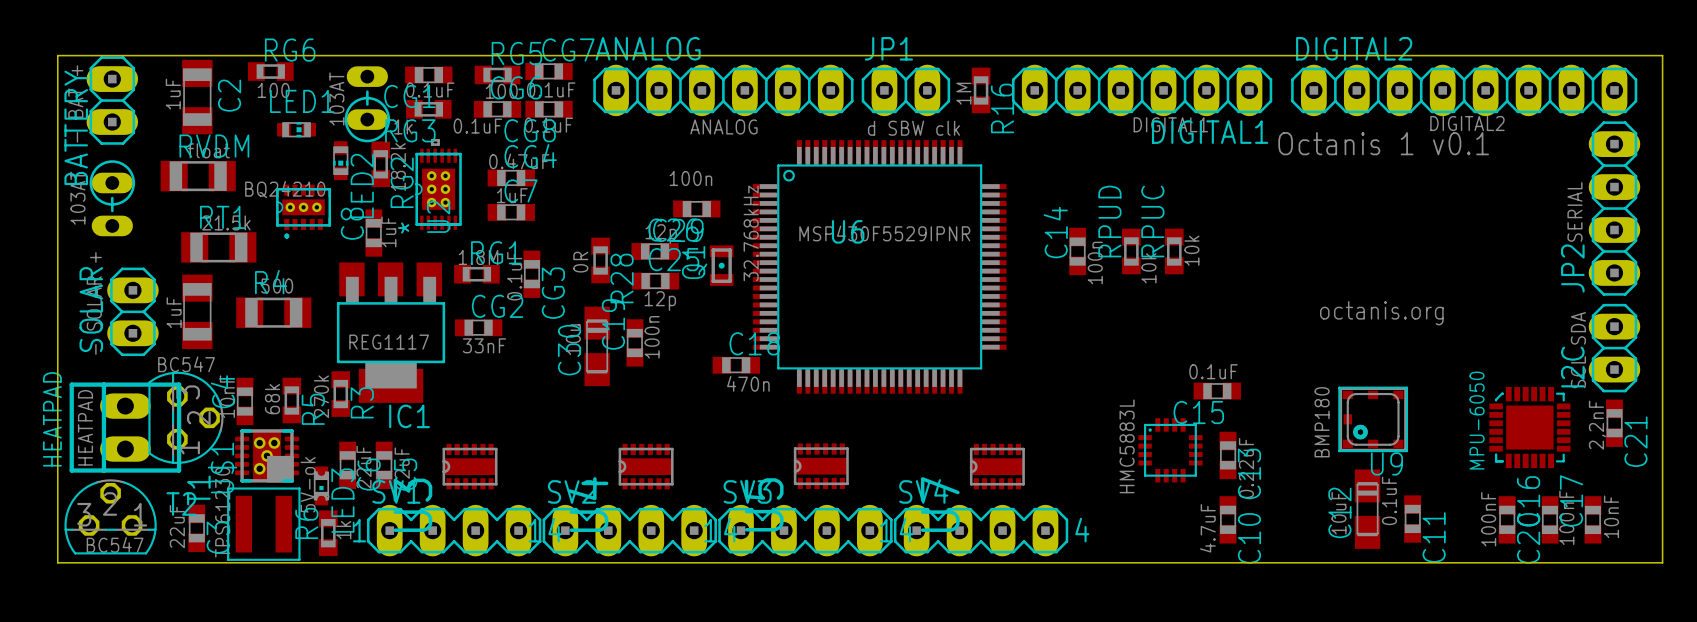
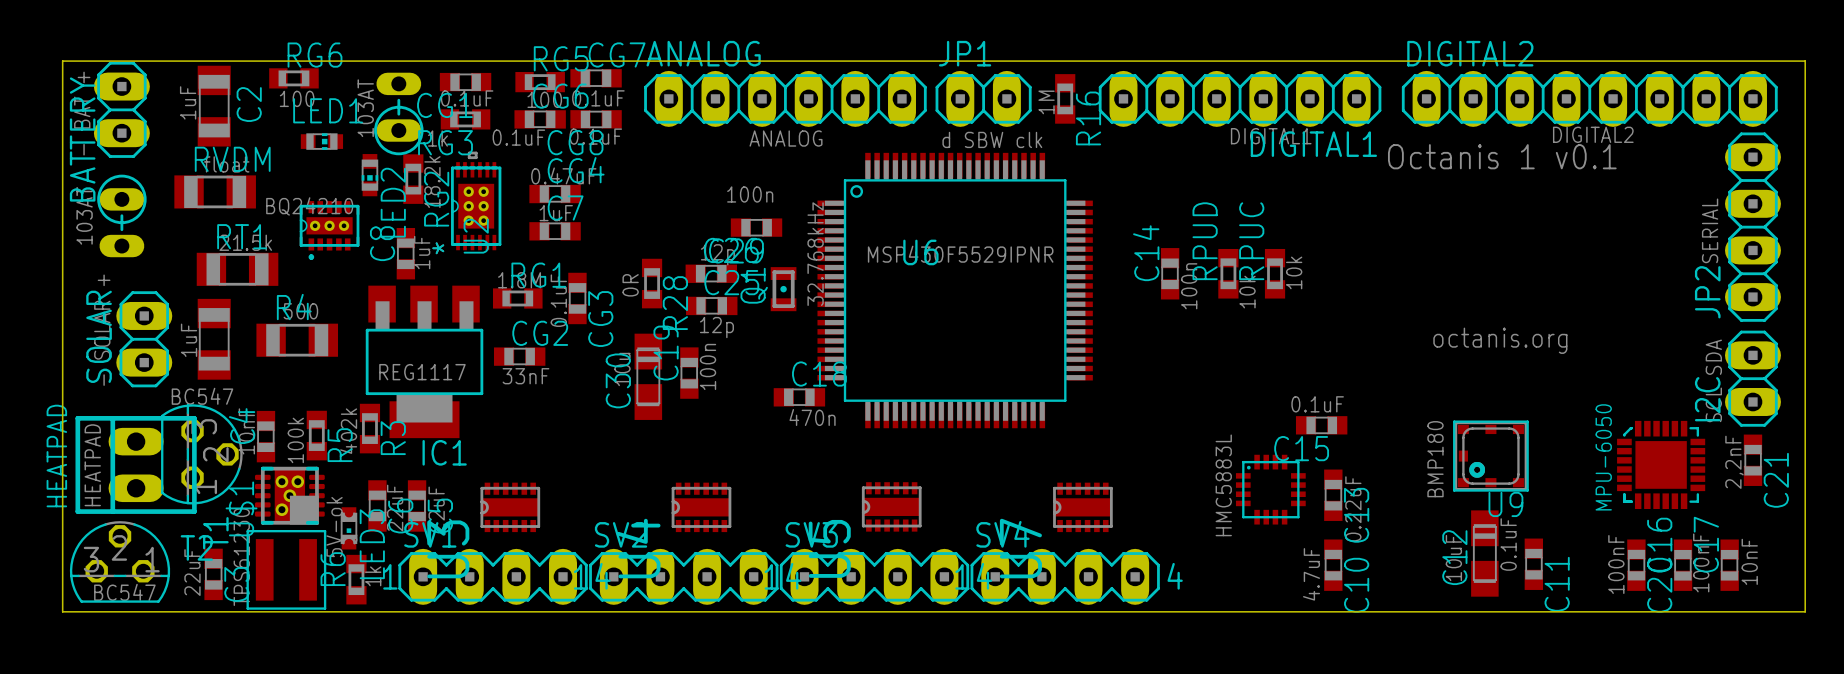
R3 value: 270k (321, 396) -> 402k (348, 431)
R5 value: 68k (272, 399) -> 100k (295, 440)

